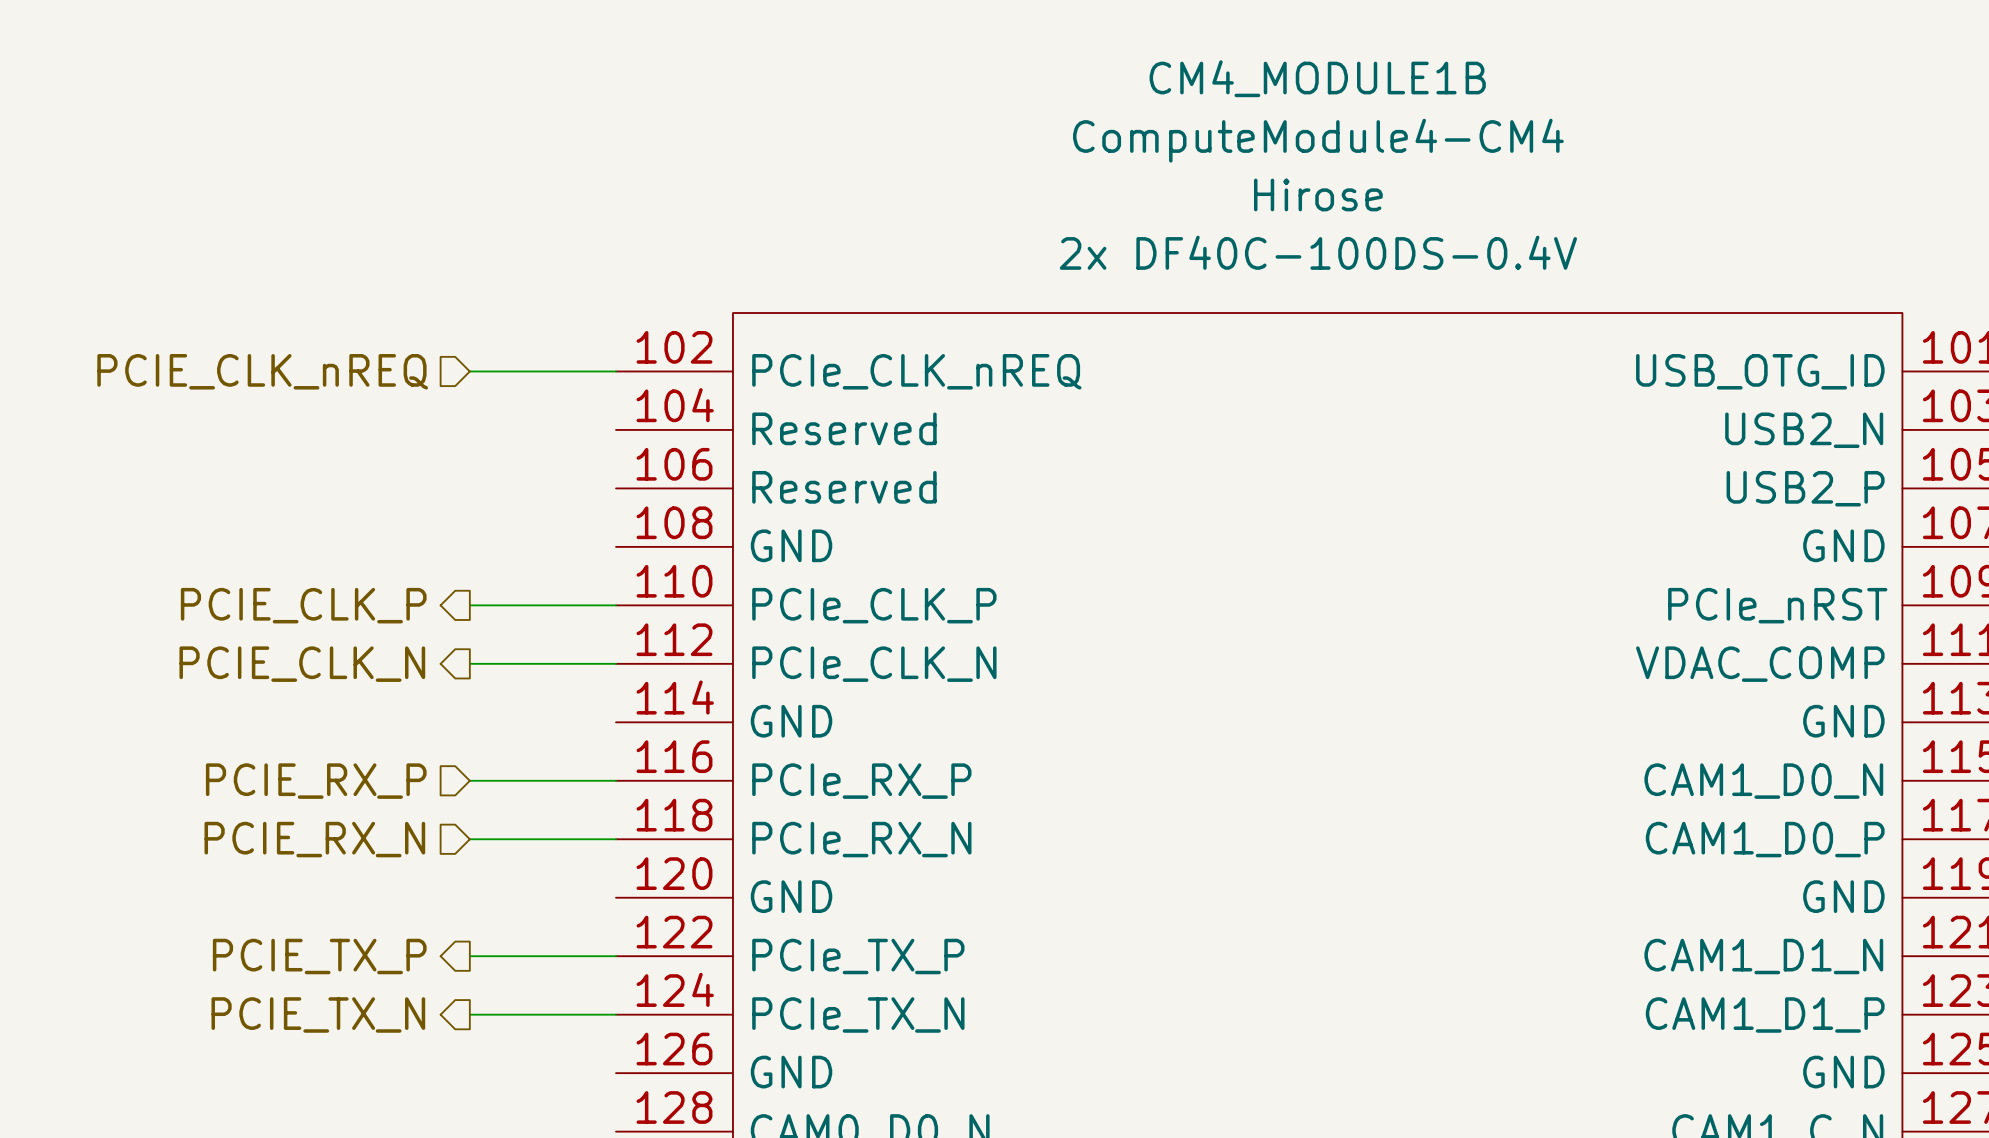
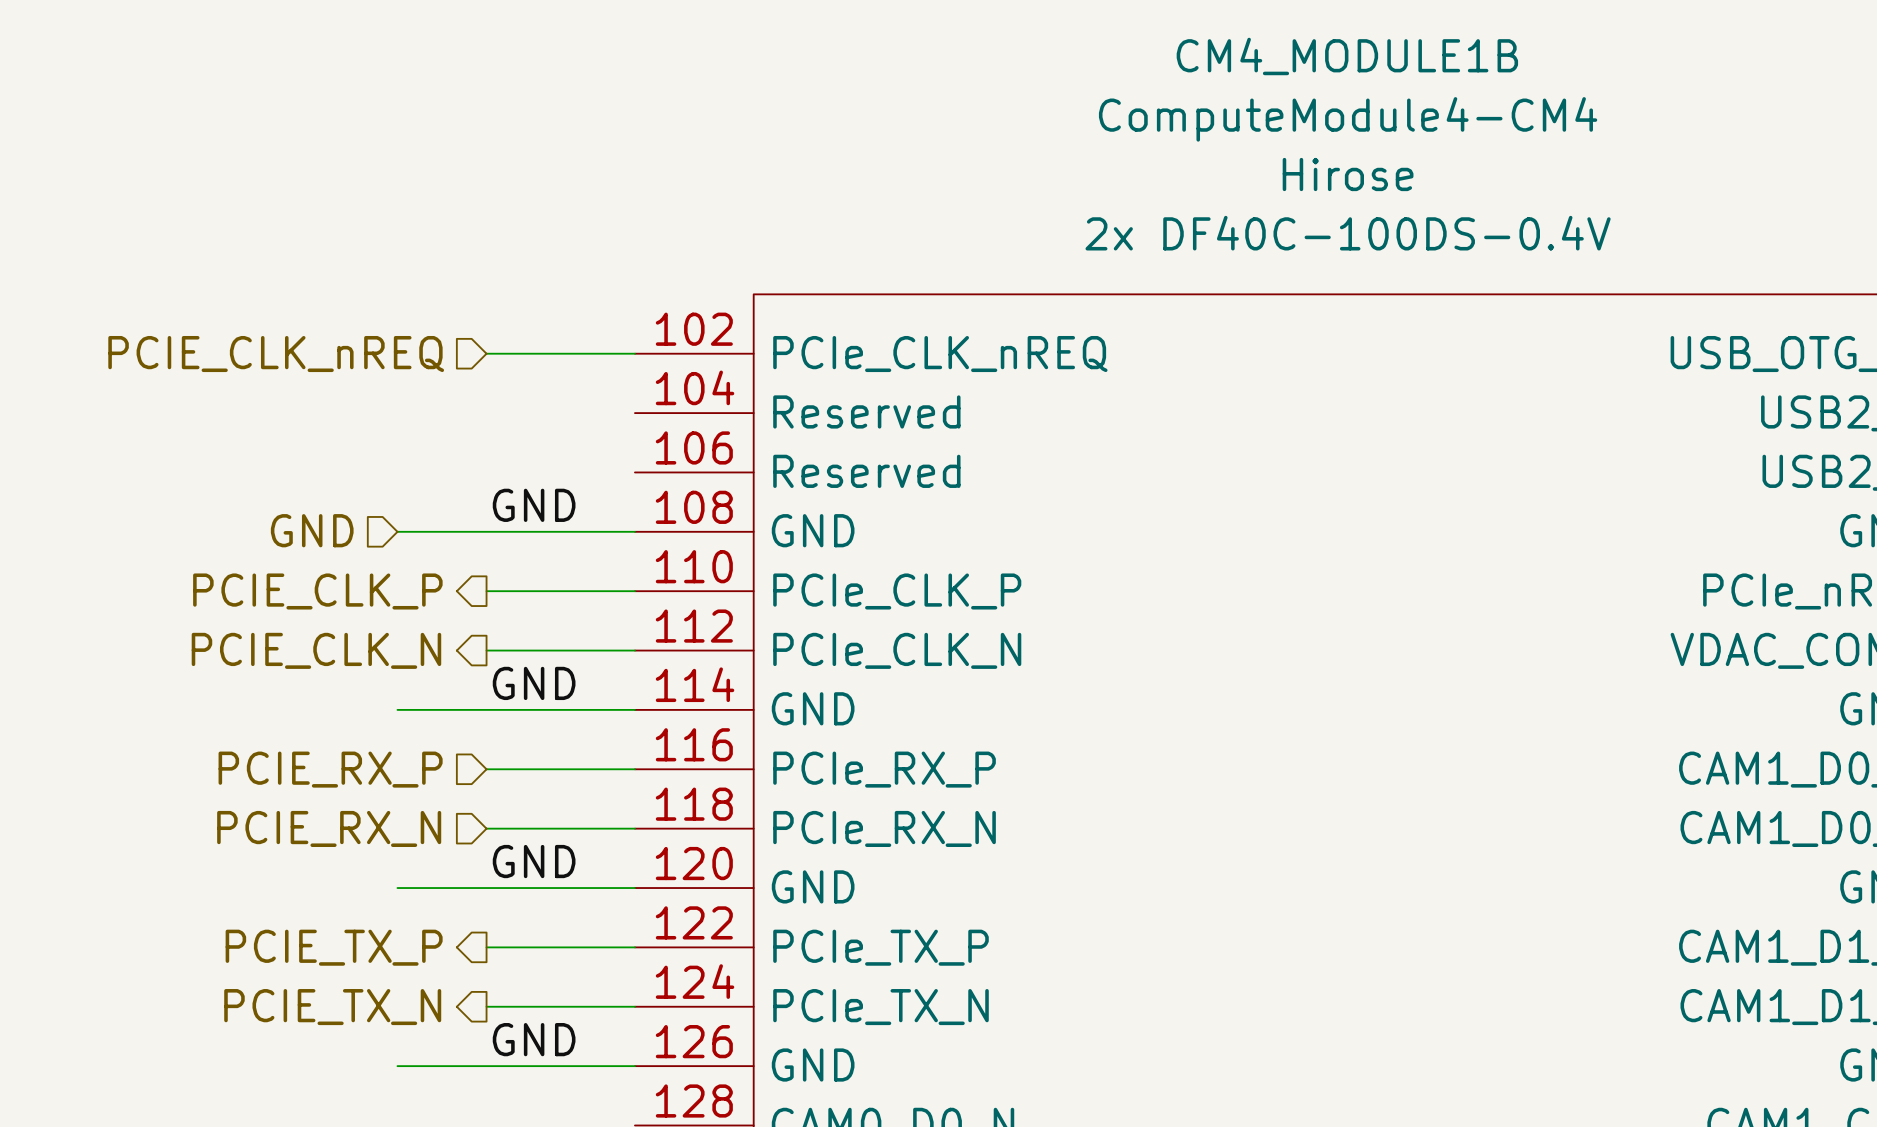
label: none -> GND (534, 505)
hierarchical label: none -> GND (312, 530)
wire: none -> (397, 531) (634, 531)
label: none -> GND (534, 683)
wire: none -> (397, 709) (634, 709)
label: none -> GND (534, 861)
wire: none -> (397, 888) (634, 888)
label: none -> GND (534, 1039)
wire: none -> (397, 1066) (634, 1066)

